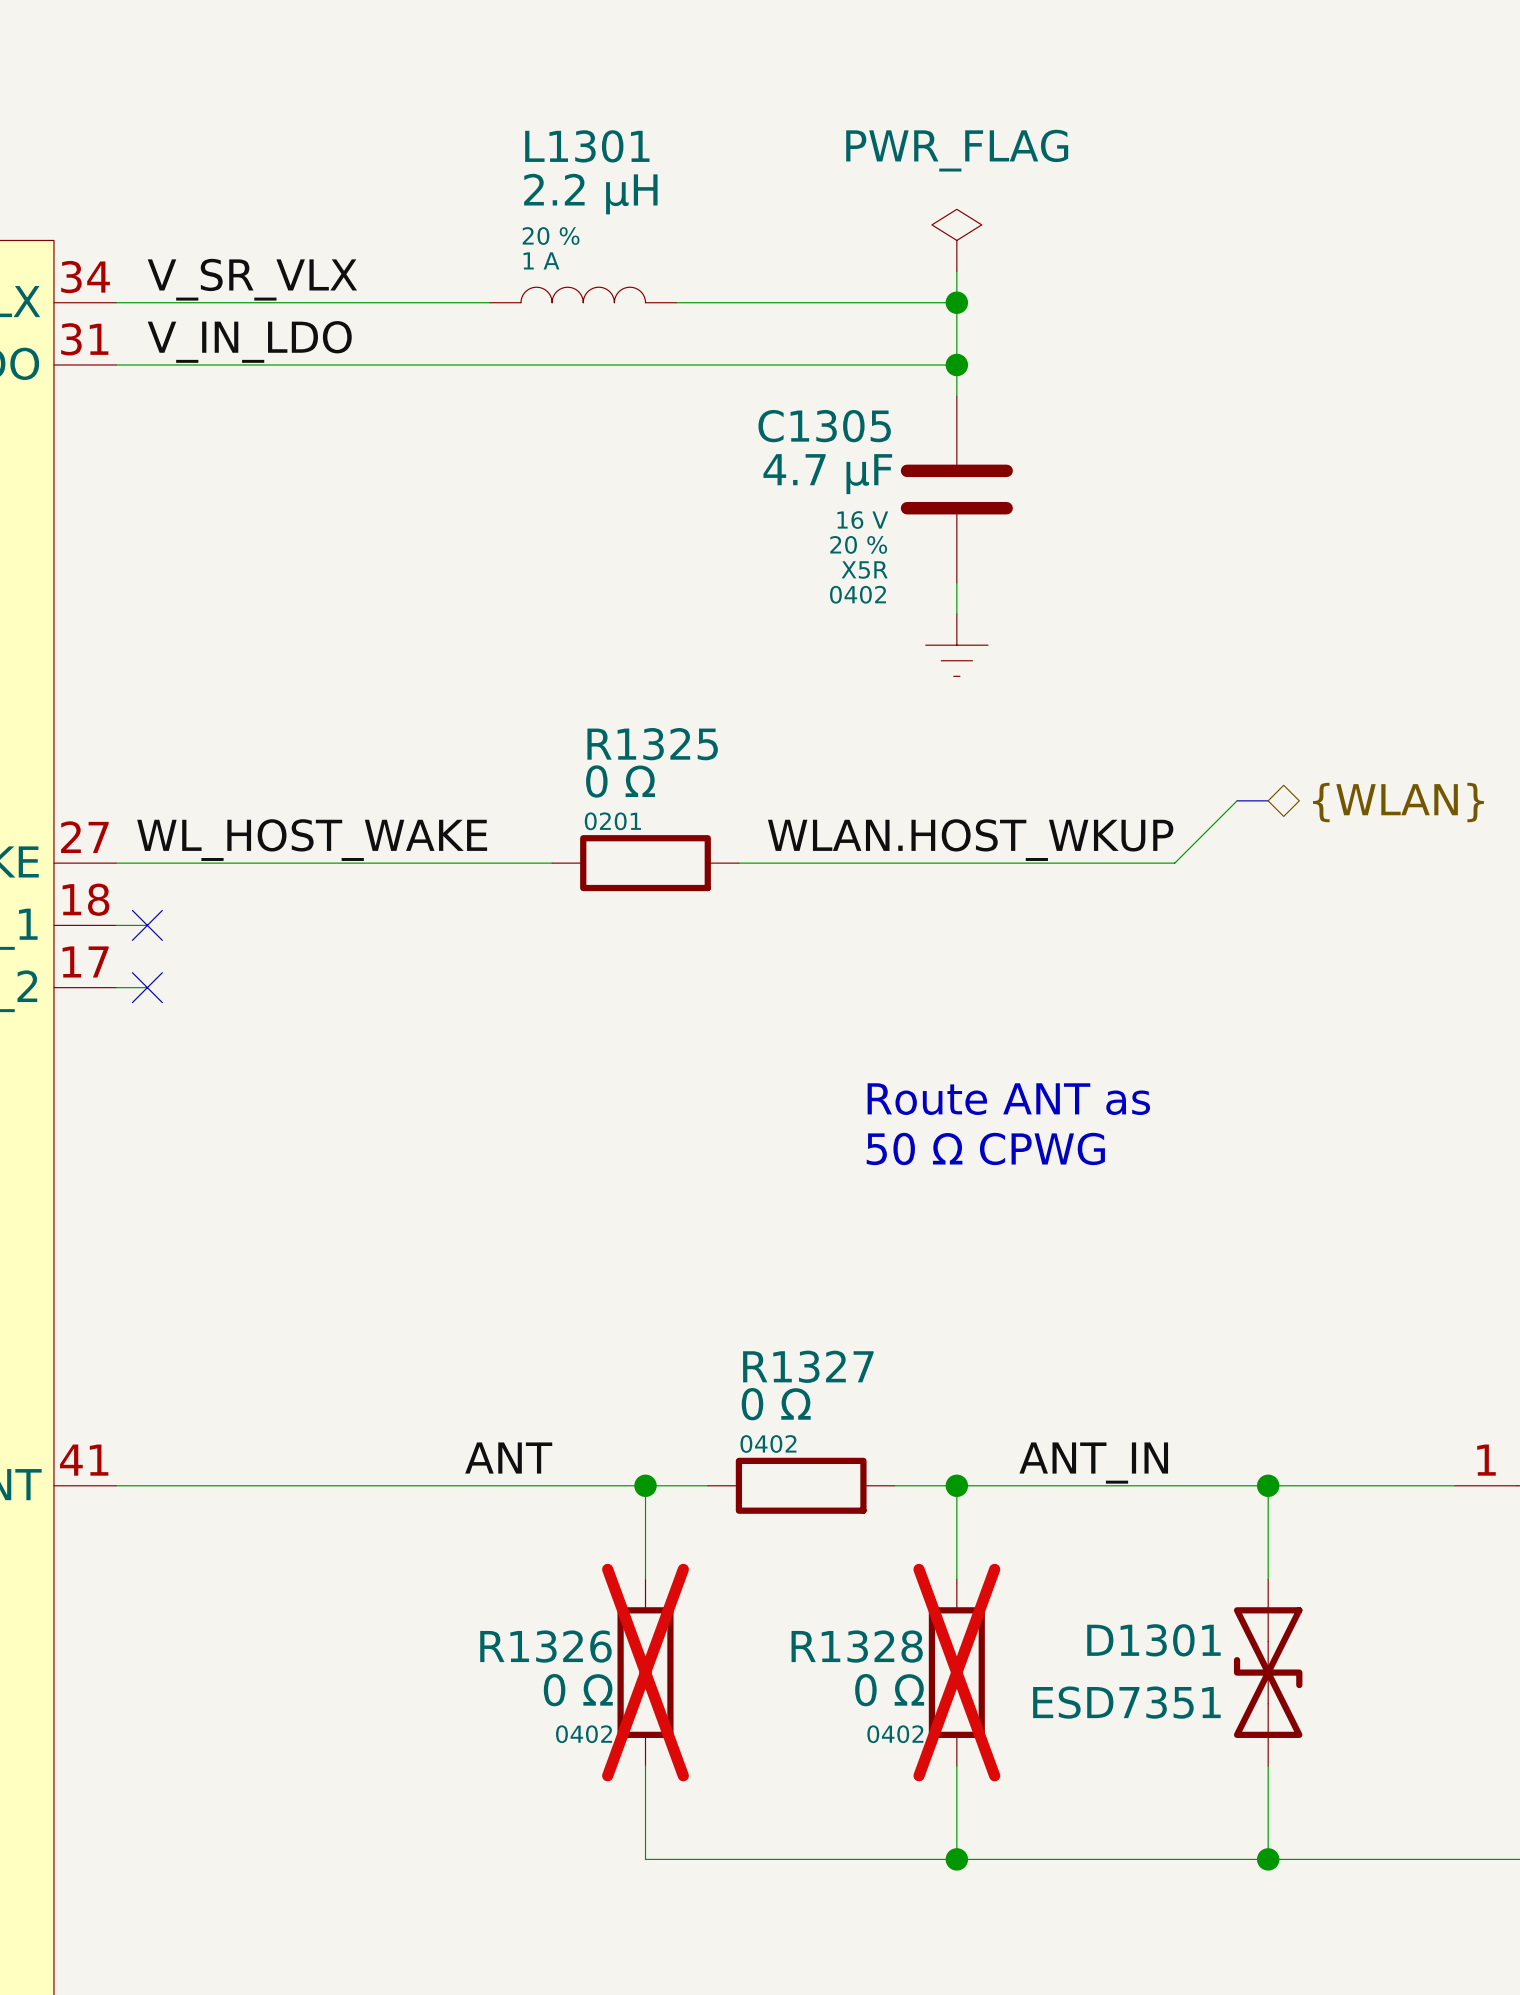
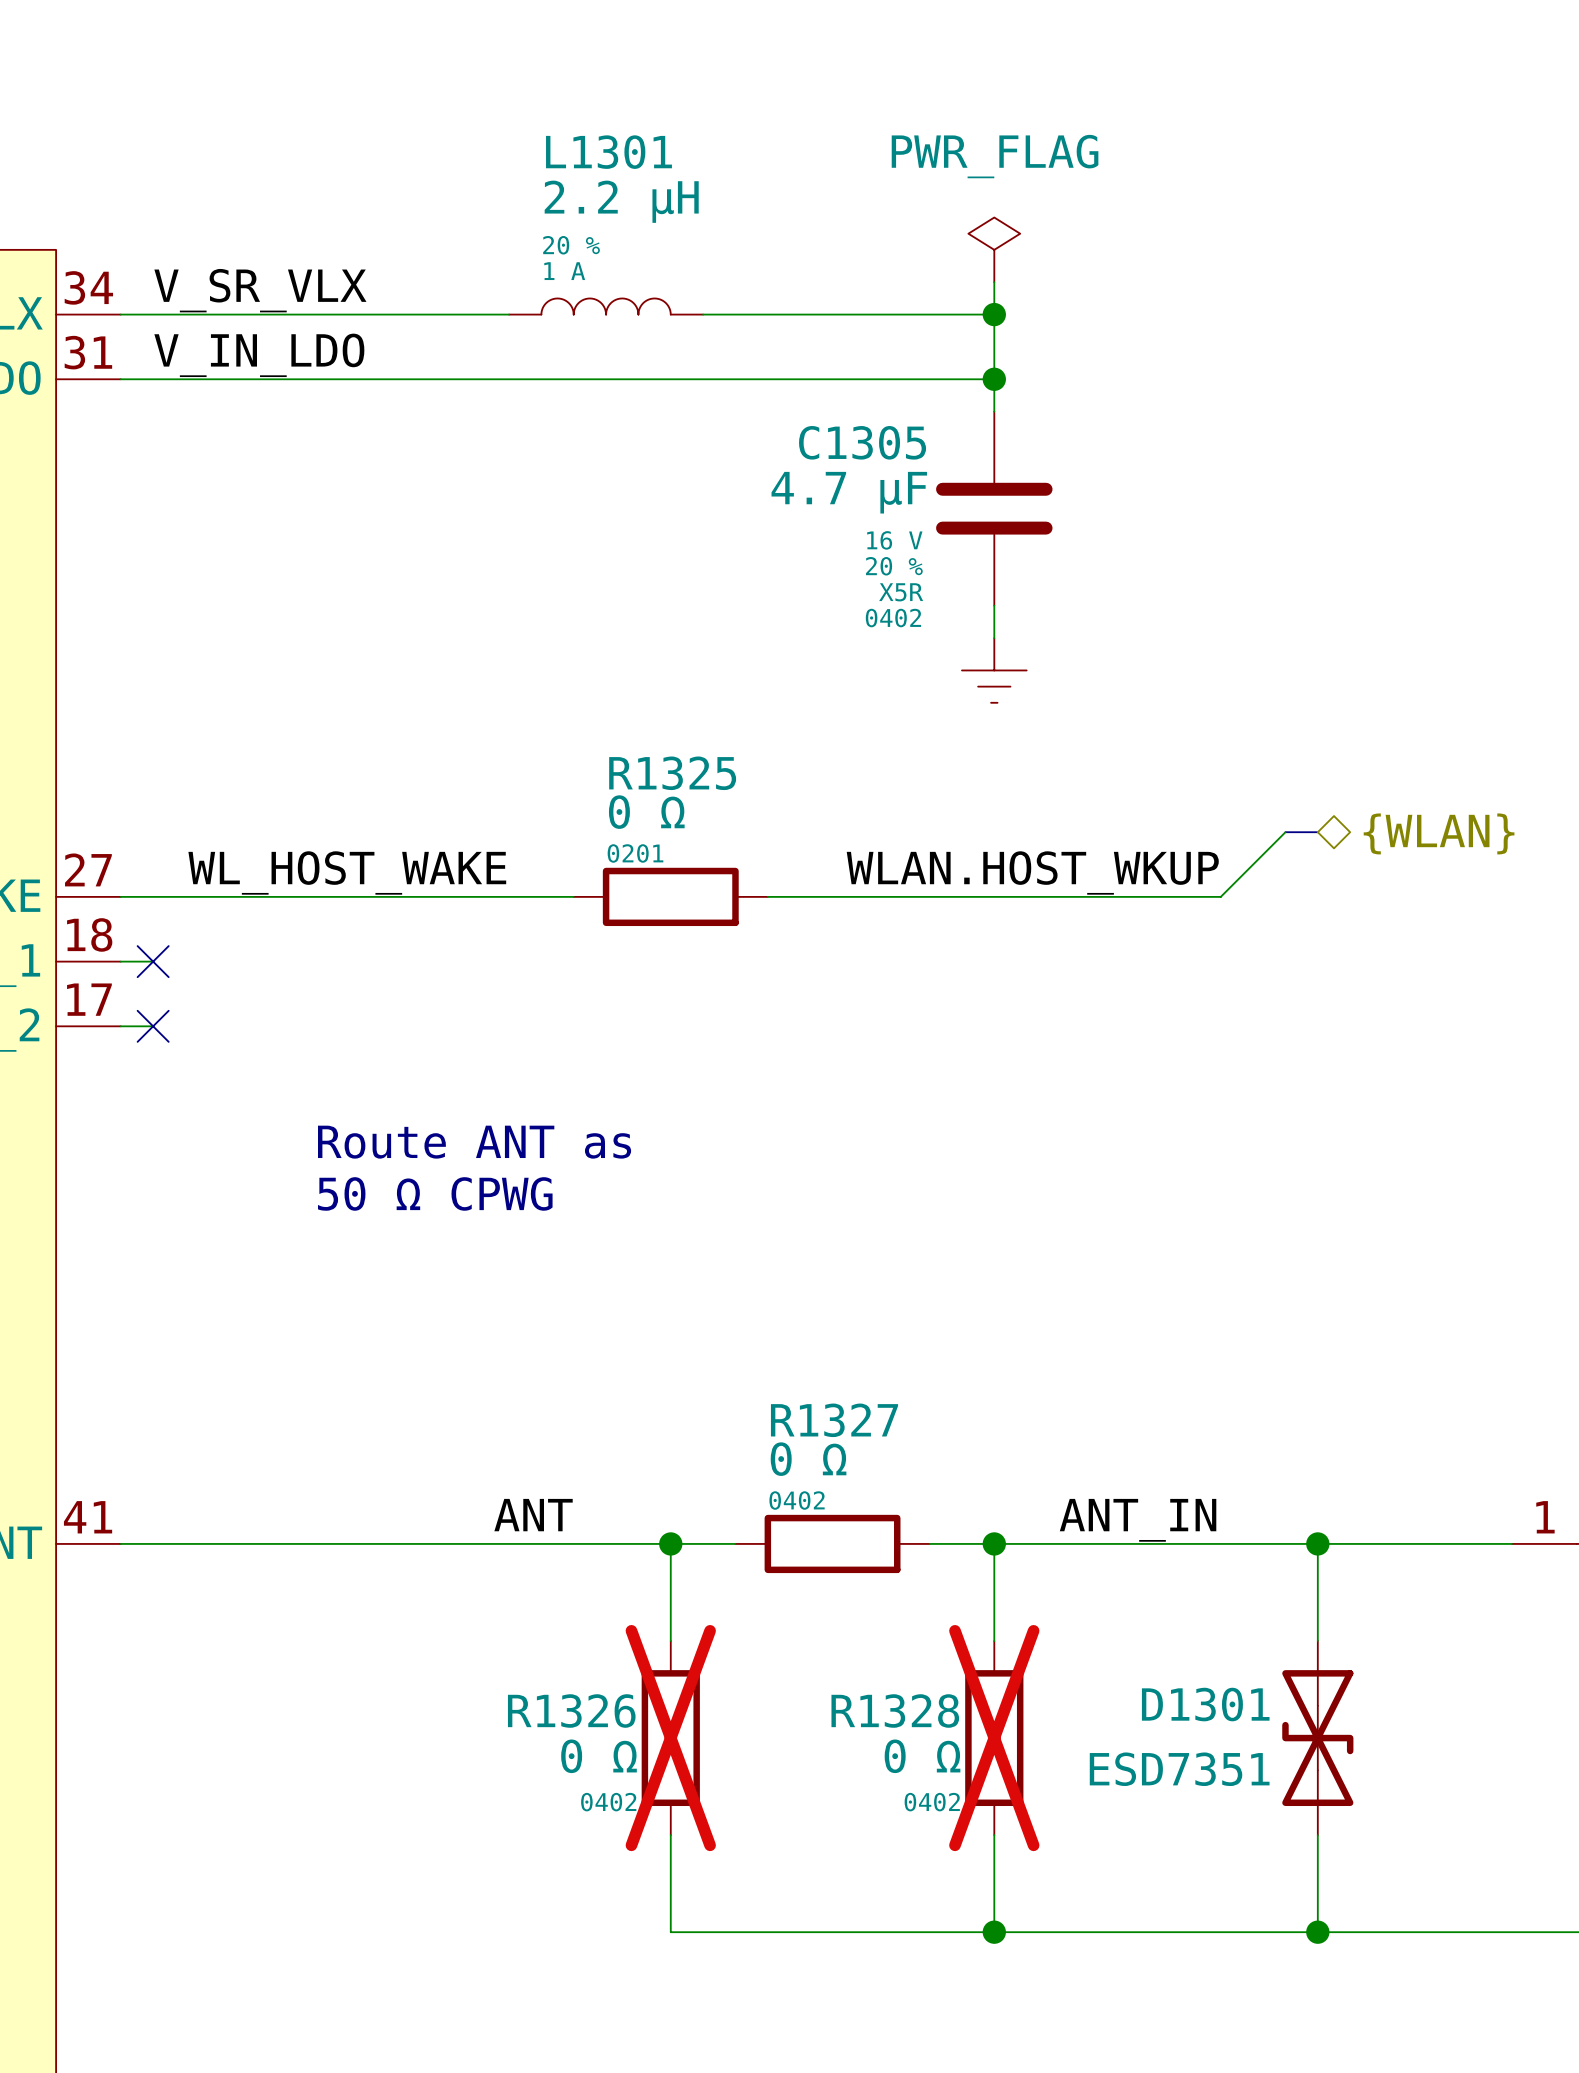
text position: Route ANT as (1008, 1099) -> Route ANT as (474, 1142)
text position: 50 Ω CPWG (985, 1148) -> 50 Ω CPWG (435, 1193)

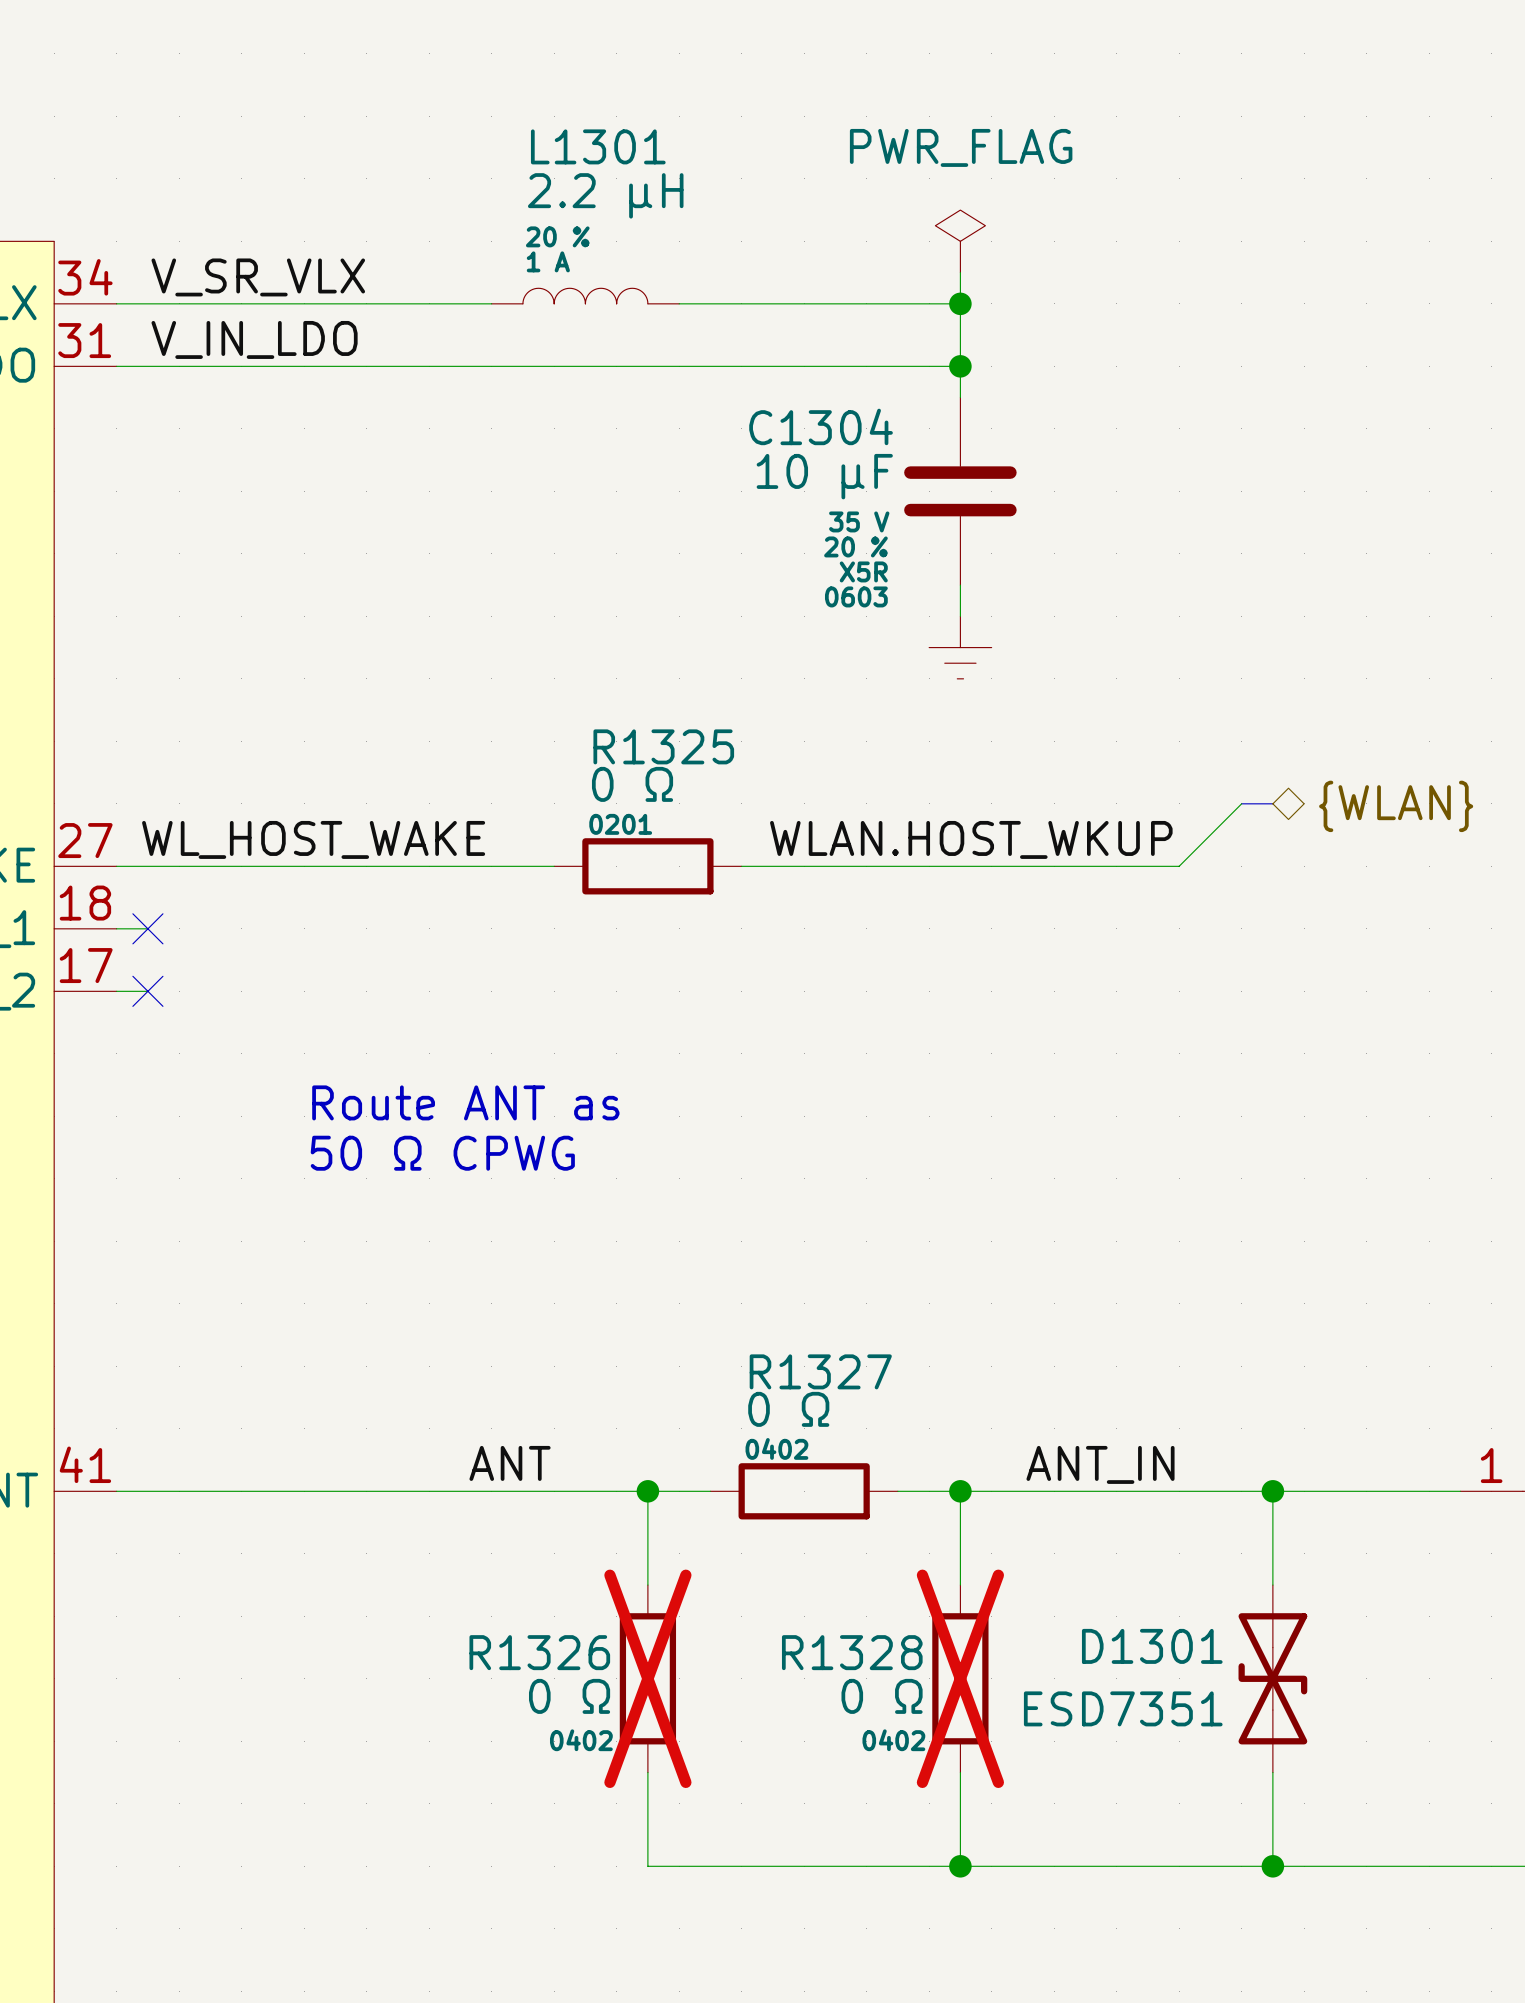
C1305 name: C1305 (862, 442) -> C1304 (821, 426)
C1305 value: 4.7 µF (849, 492) -> 10 µF (824, 476)
C1305 text: 16 V (894, 540) -> 35 V (859, 521)
C1305 text: 0402 (893, 618) -> 0603 (856, 596)

